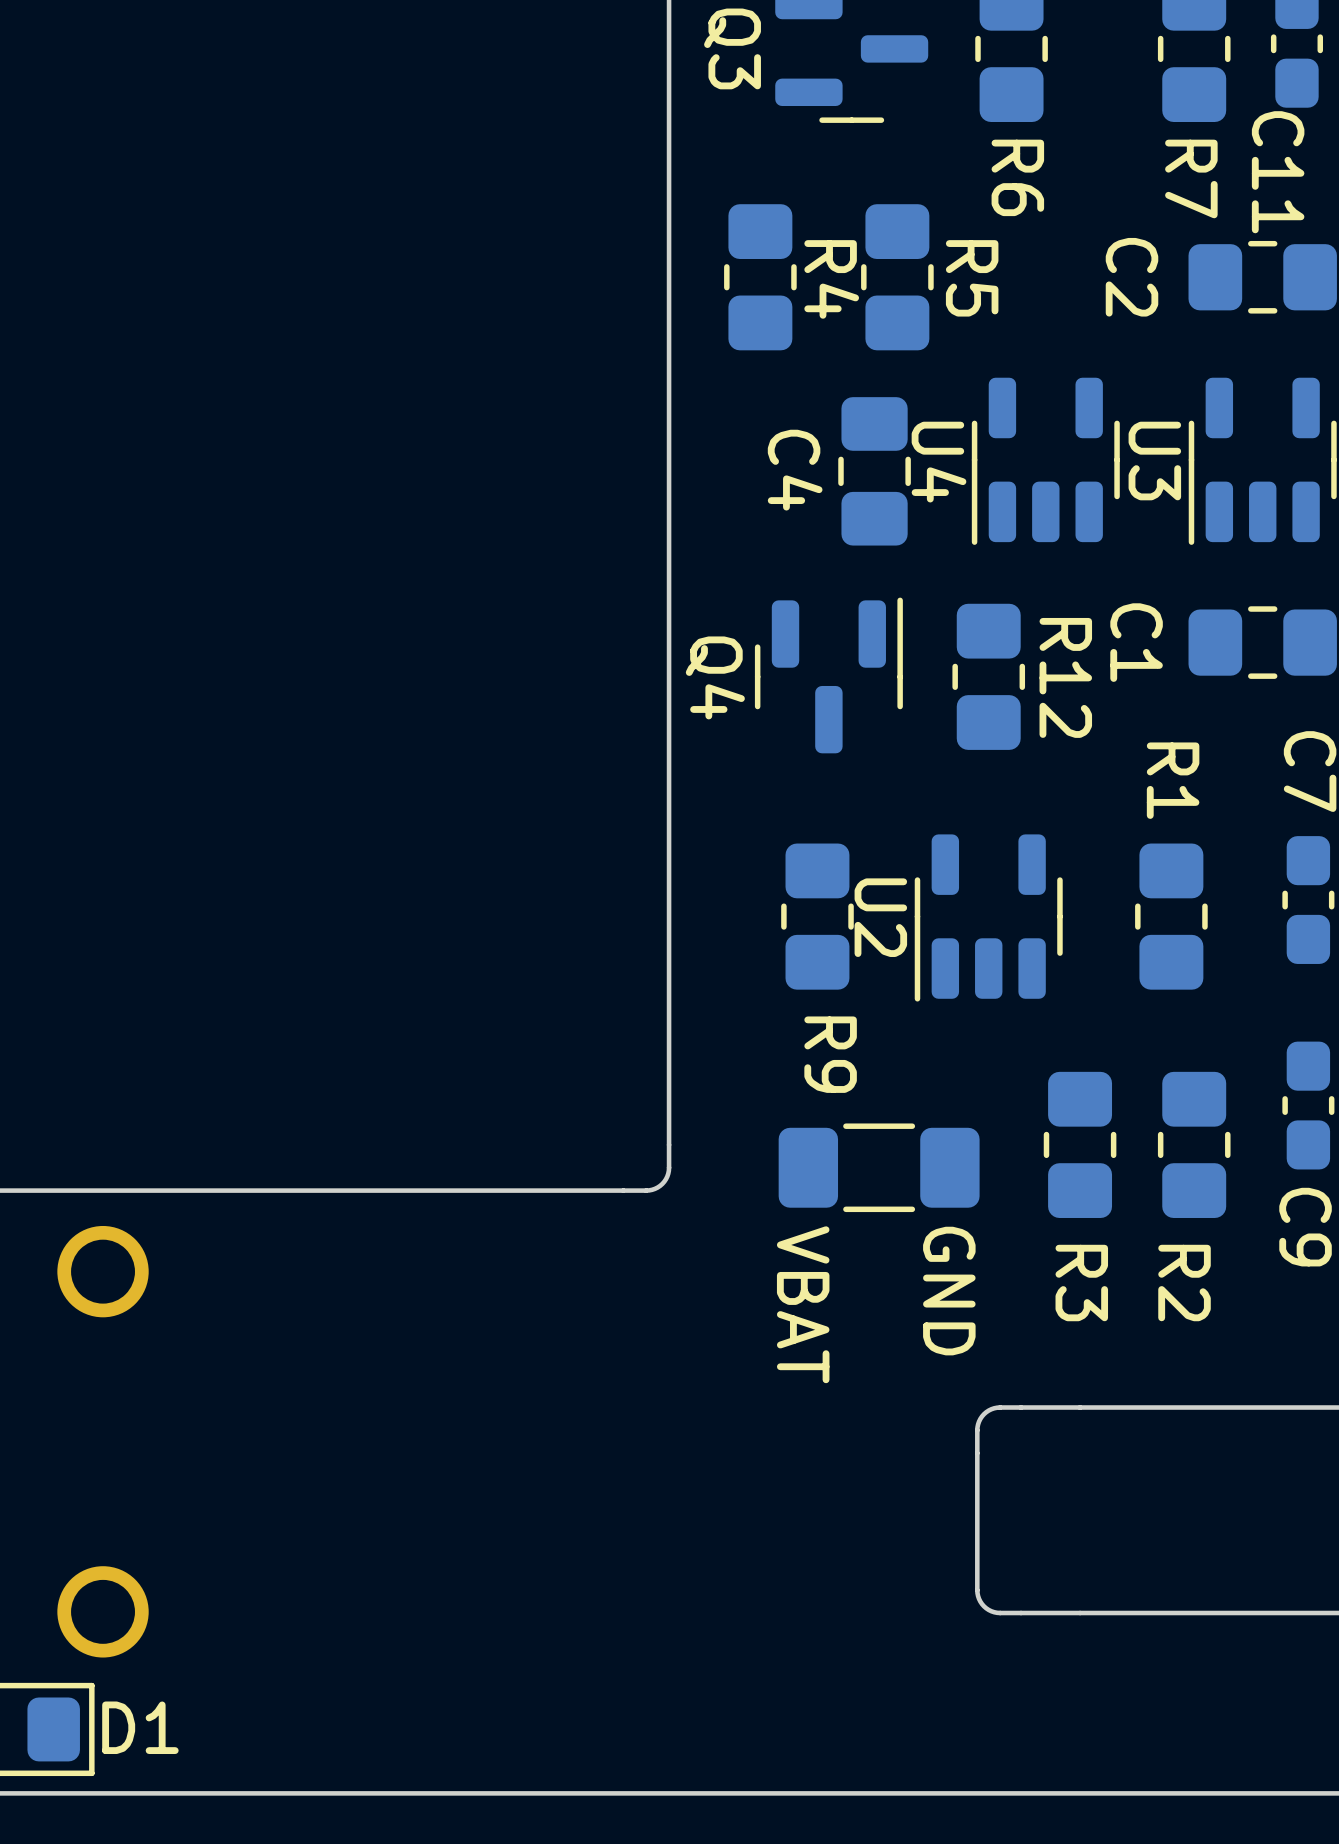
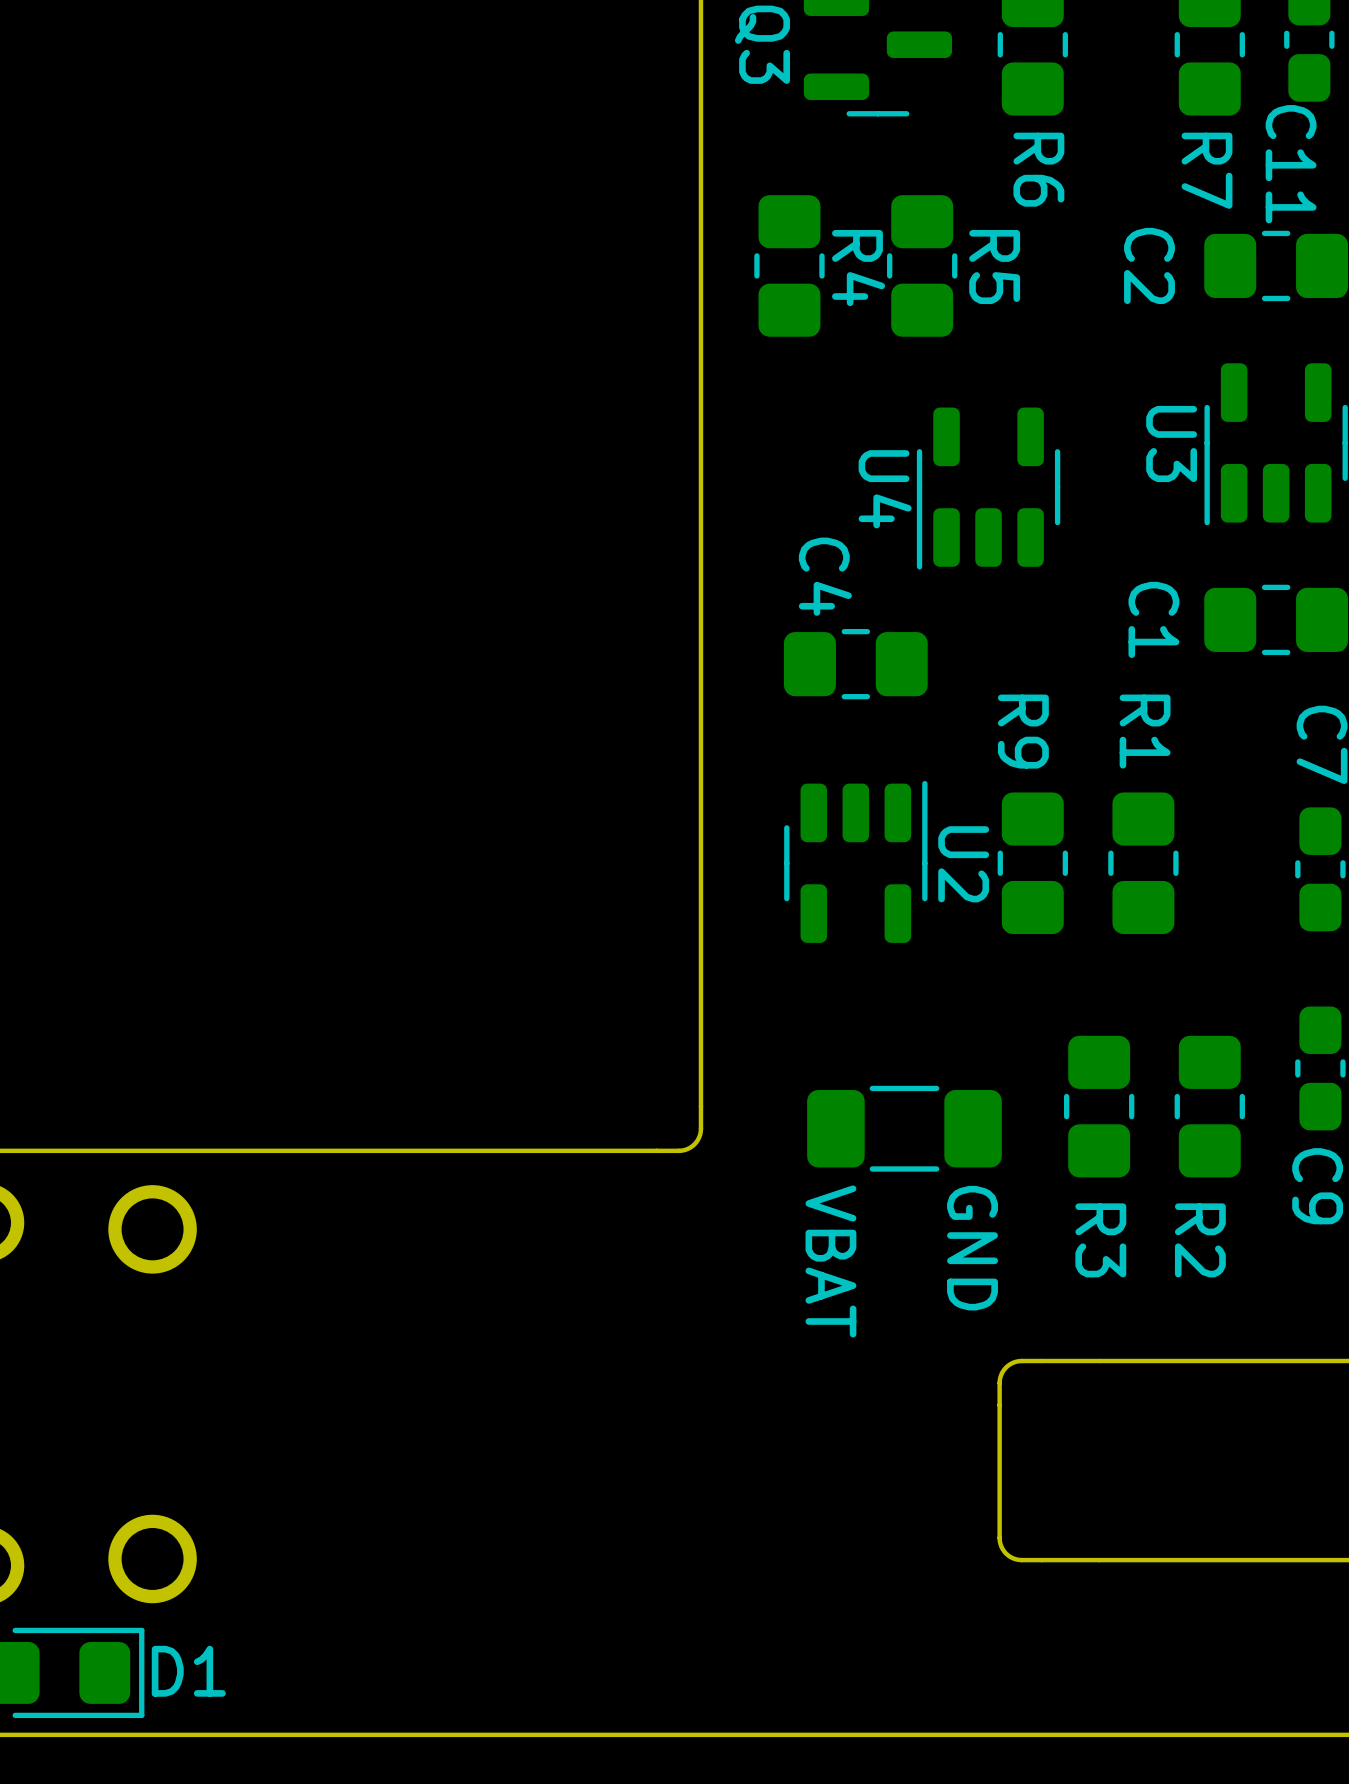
U4 position: (1045, 461) -> (988, 488)
C4 rotation: 0° (874, 471) -> 90° clockwise (855, 664)
C4 position: (874, 471) -> (855, 664)
Q4: (828, 675) -> none
R12: (988, 676) -> none
R9 position: (817, 916) -> (1032, 863)
R1 position: (1171, 916) -> (1143, 863)
U2 rotation: 0° (988, 917) -> 180° (855, 861)
U2 position: (988, 917) -> (855, 861)
R9 name position: R9 (830, 1054) -> R9 (1023, 731)

